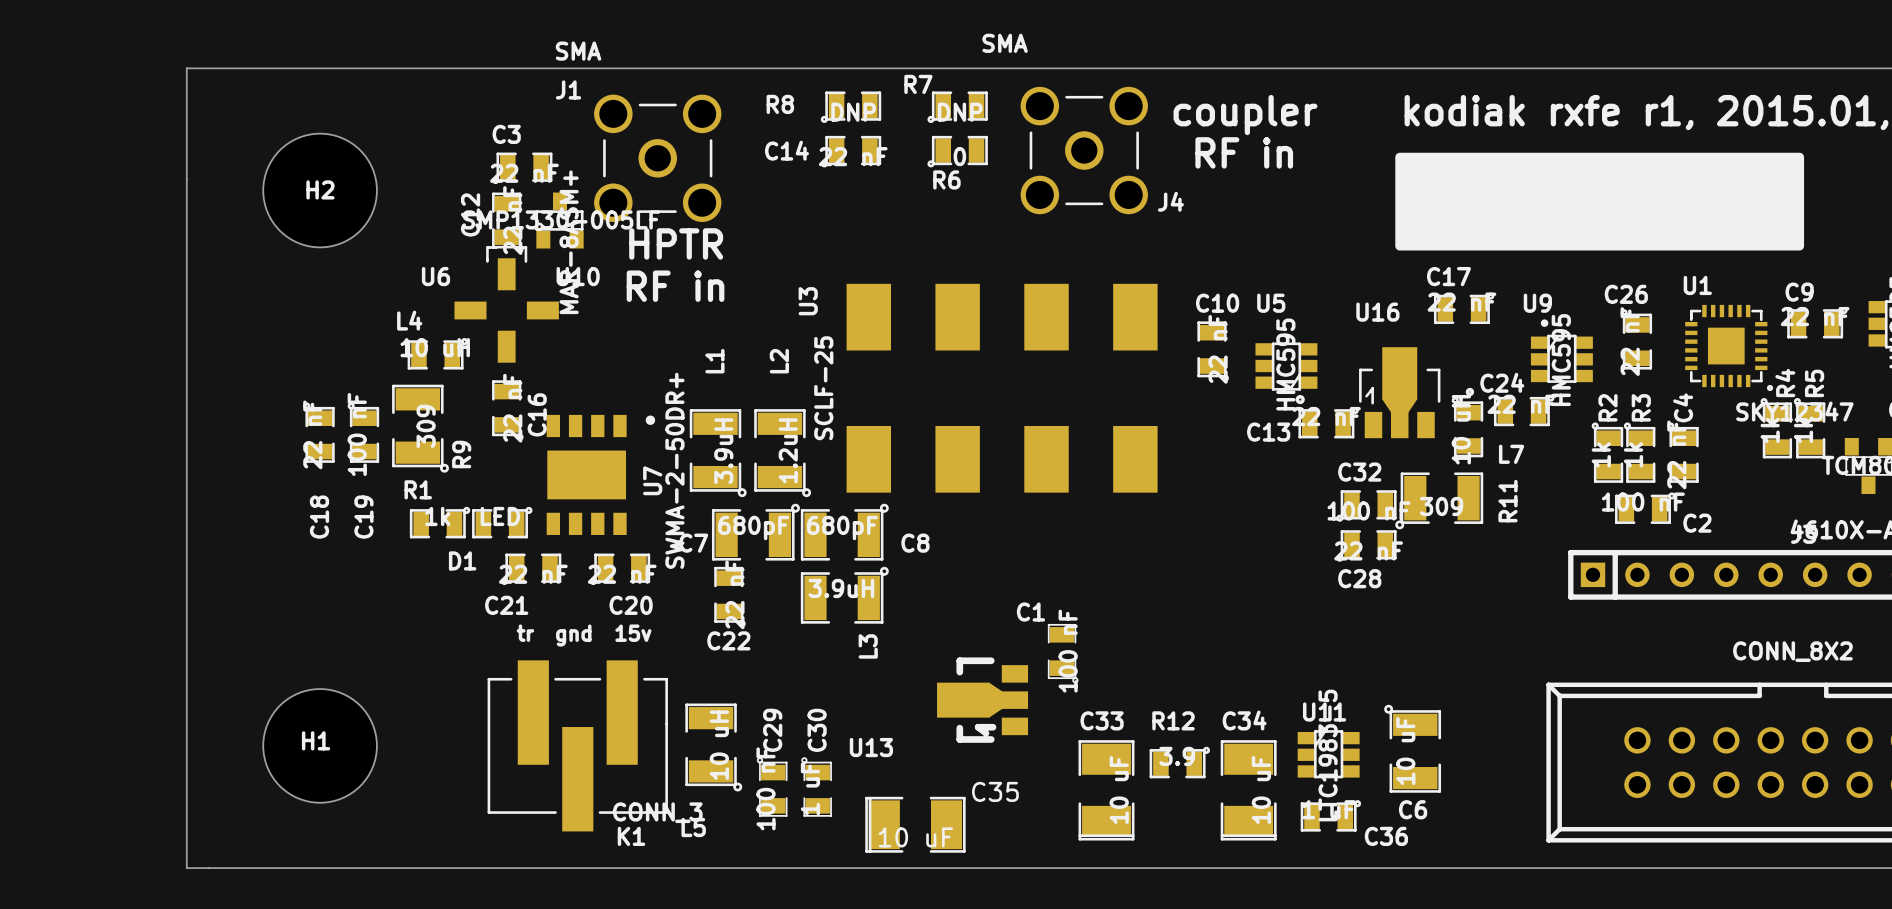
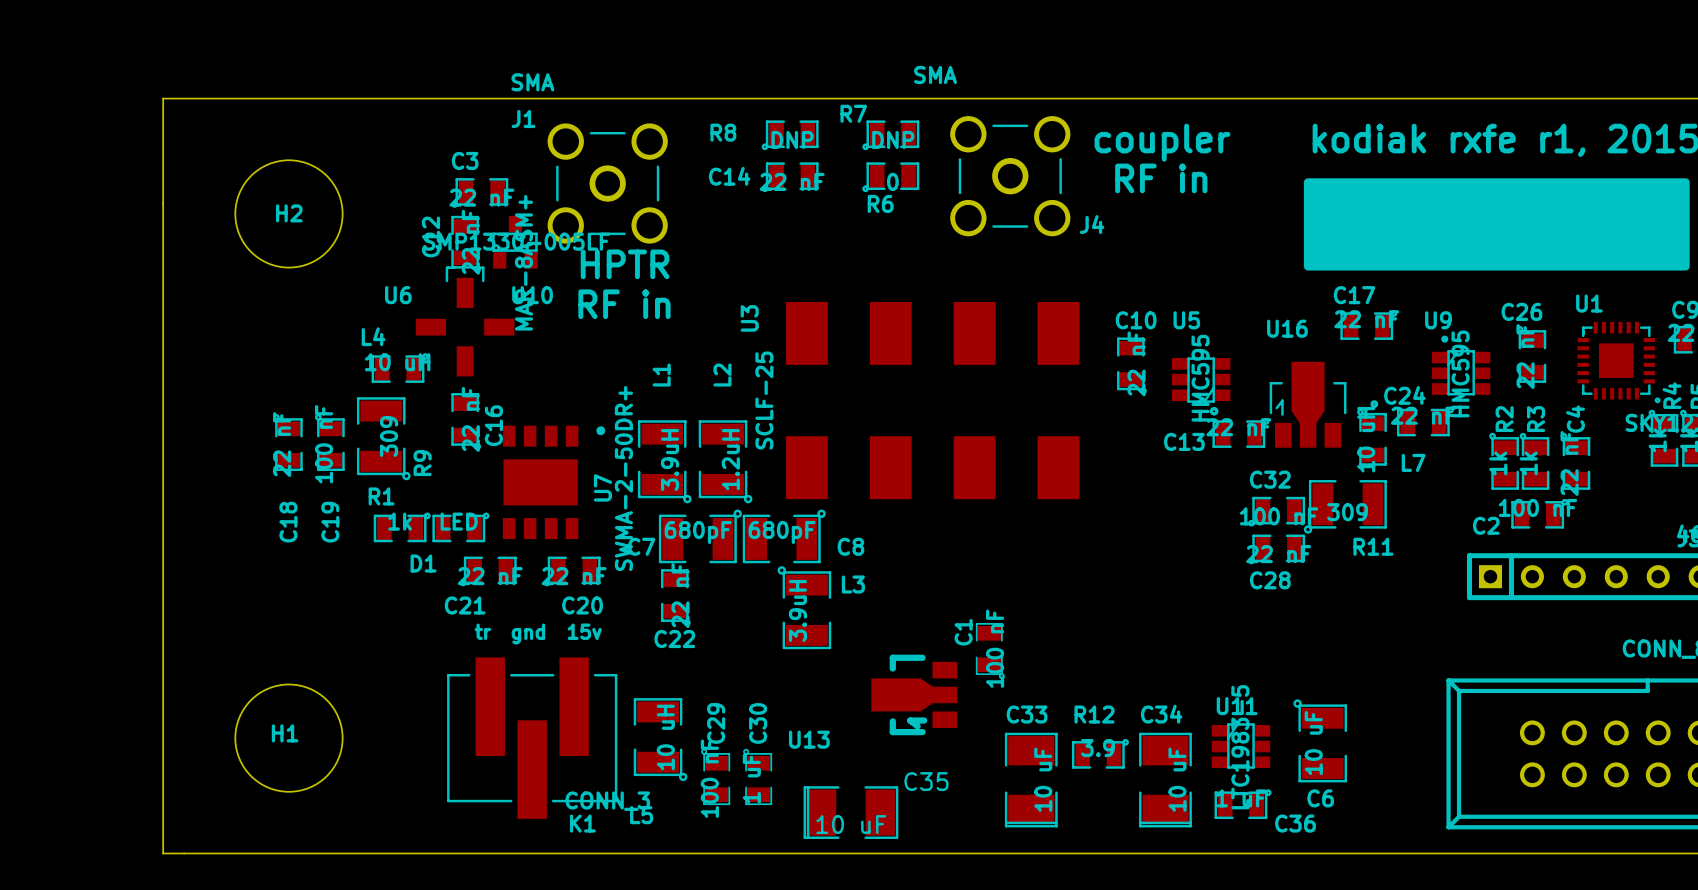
R11 name rotation: 0° (1508, 501) -> 90° clockwise (1373, 546)
R11 name position: R11 (1508, 501) -> R11 (1373, 546)
C2 name position: C2 (1697, 523) -> C2 (1486, 525)
L3 rotation: 0° (844, 595) -> 90° counterclockwise (804, 607)
C1 name rotation: 0° (1030, 612) -> 90° counterclockwise (963, 632)

